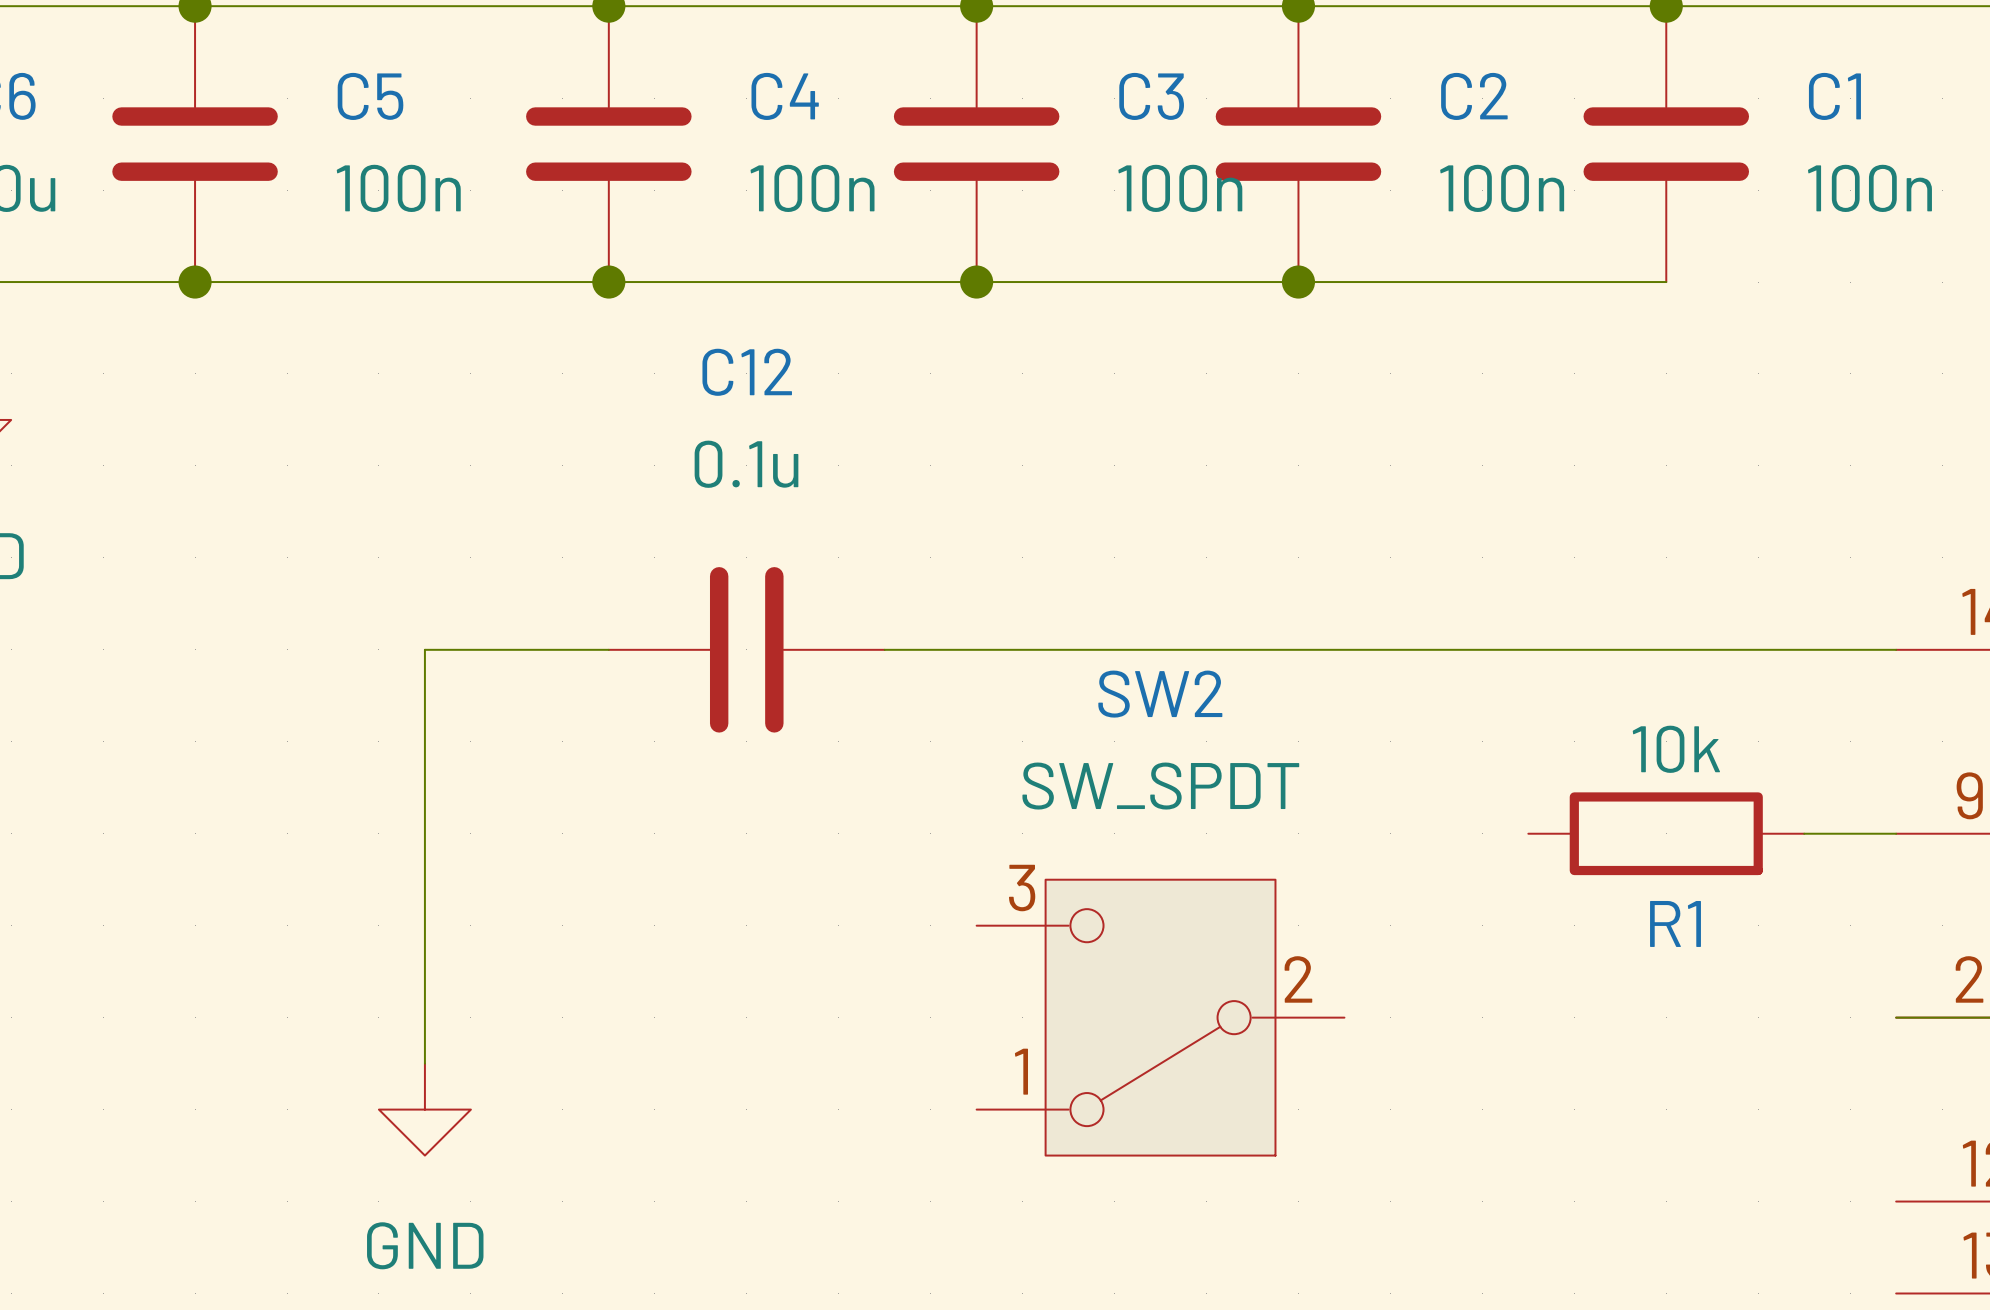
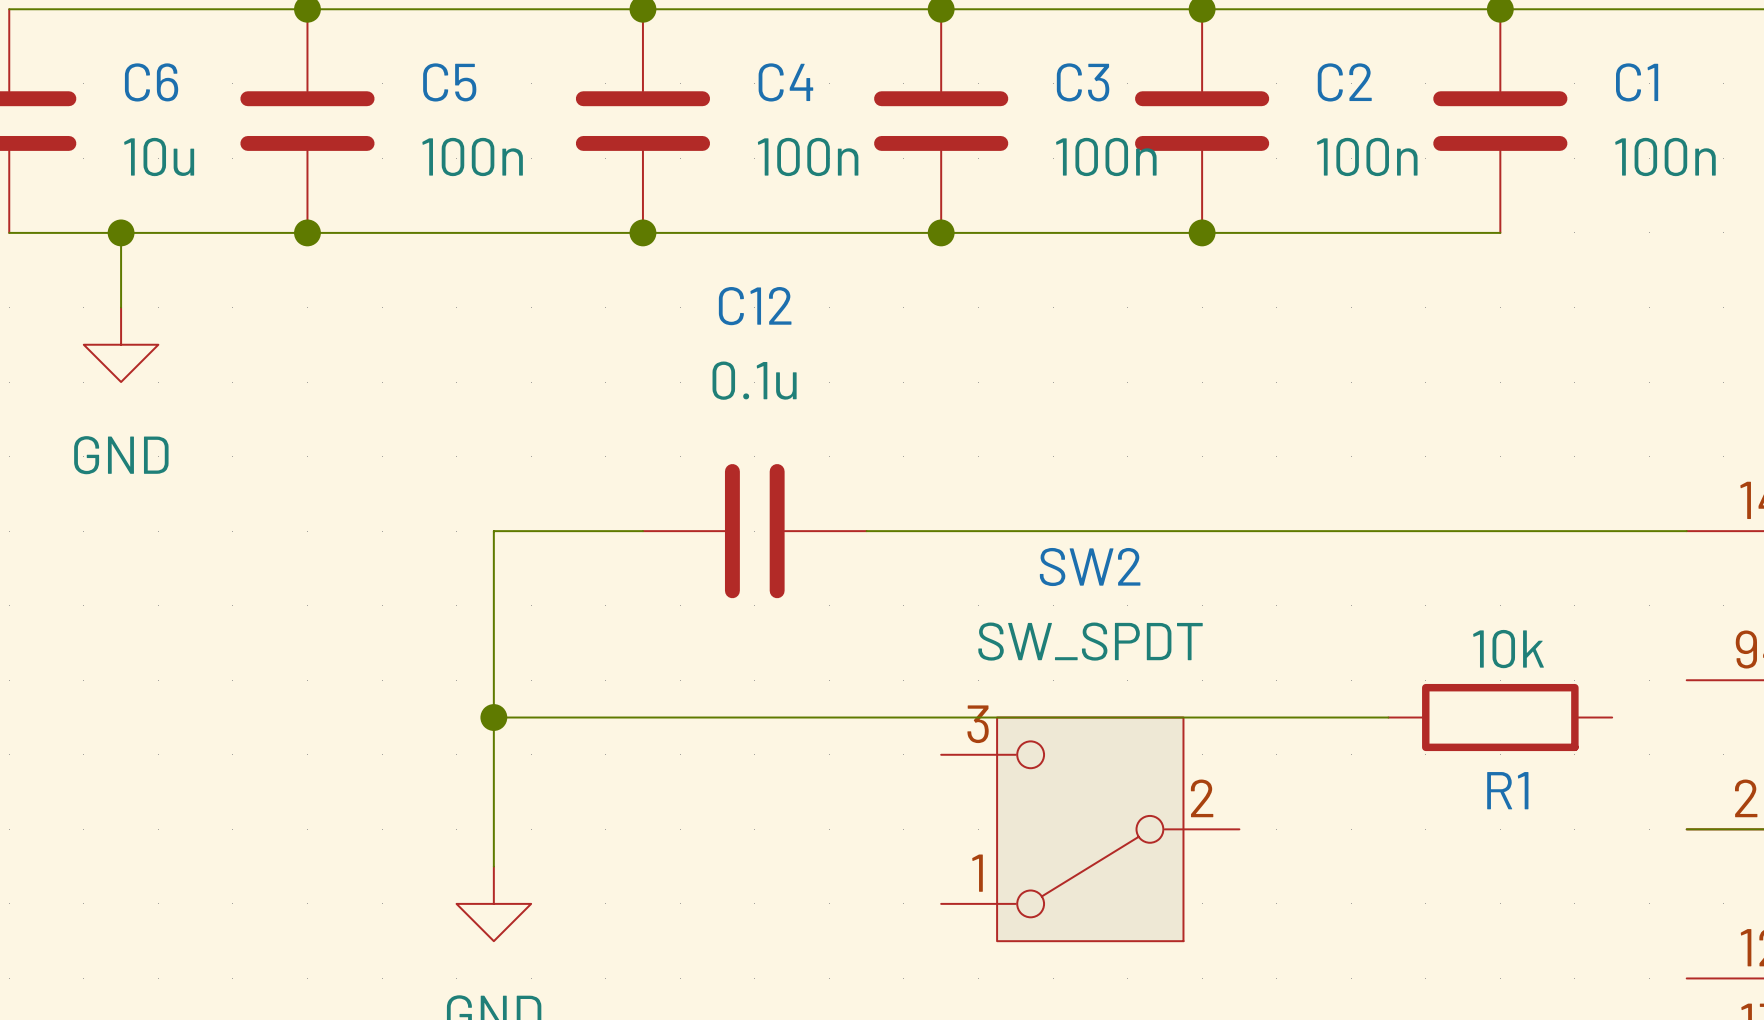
R1 position: (1666, 833) -> (1500, 717)
wire: (1804, 833) (1896, 833) -> none
wire: none -> (493, 717) (1388, 717)
junction: none -> (493, 717)

